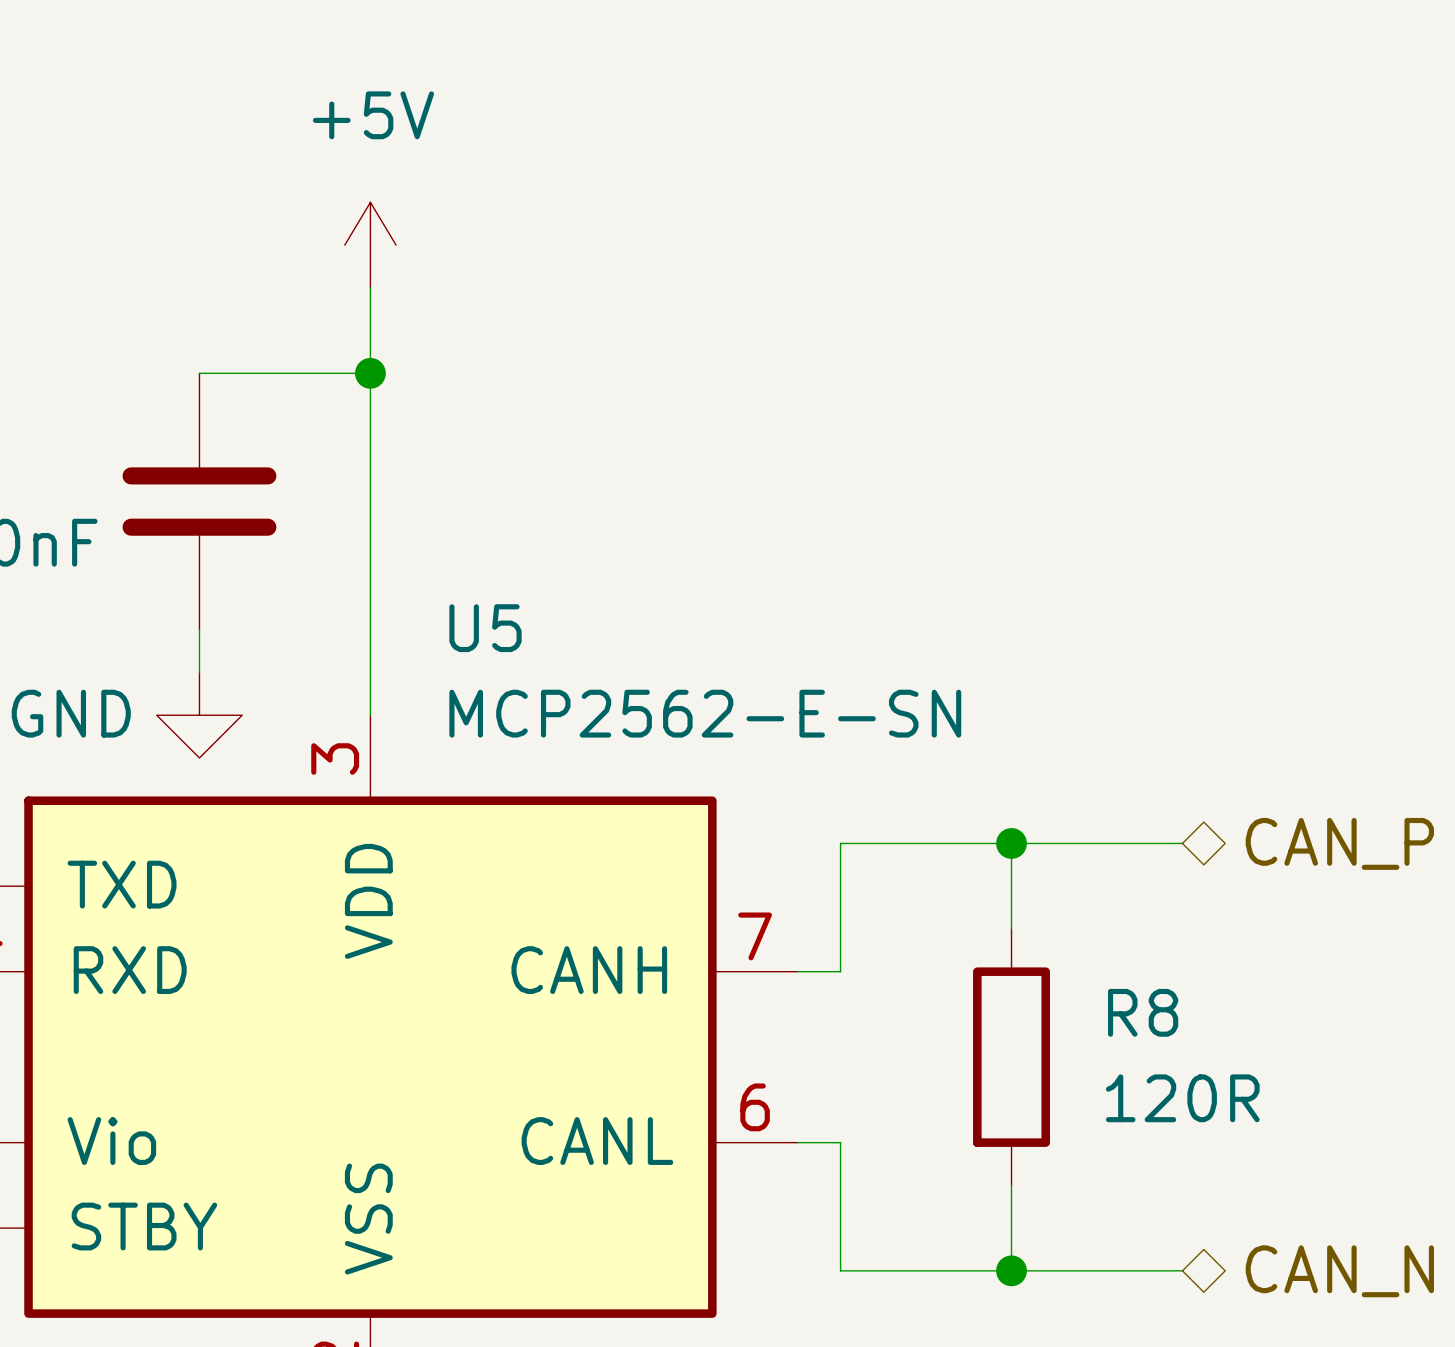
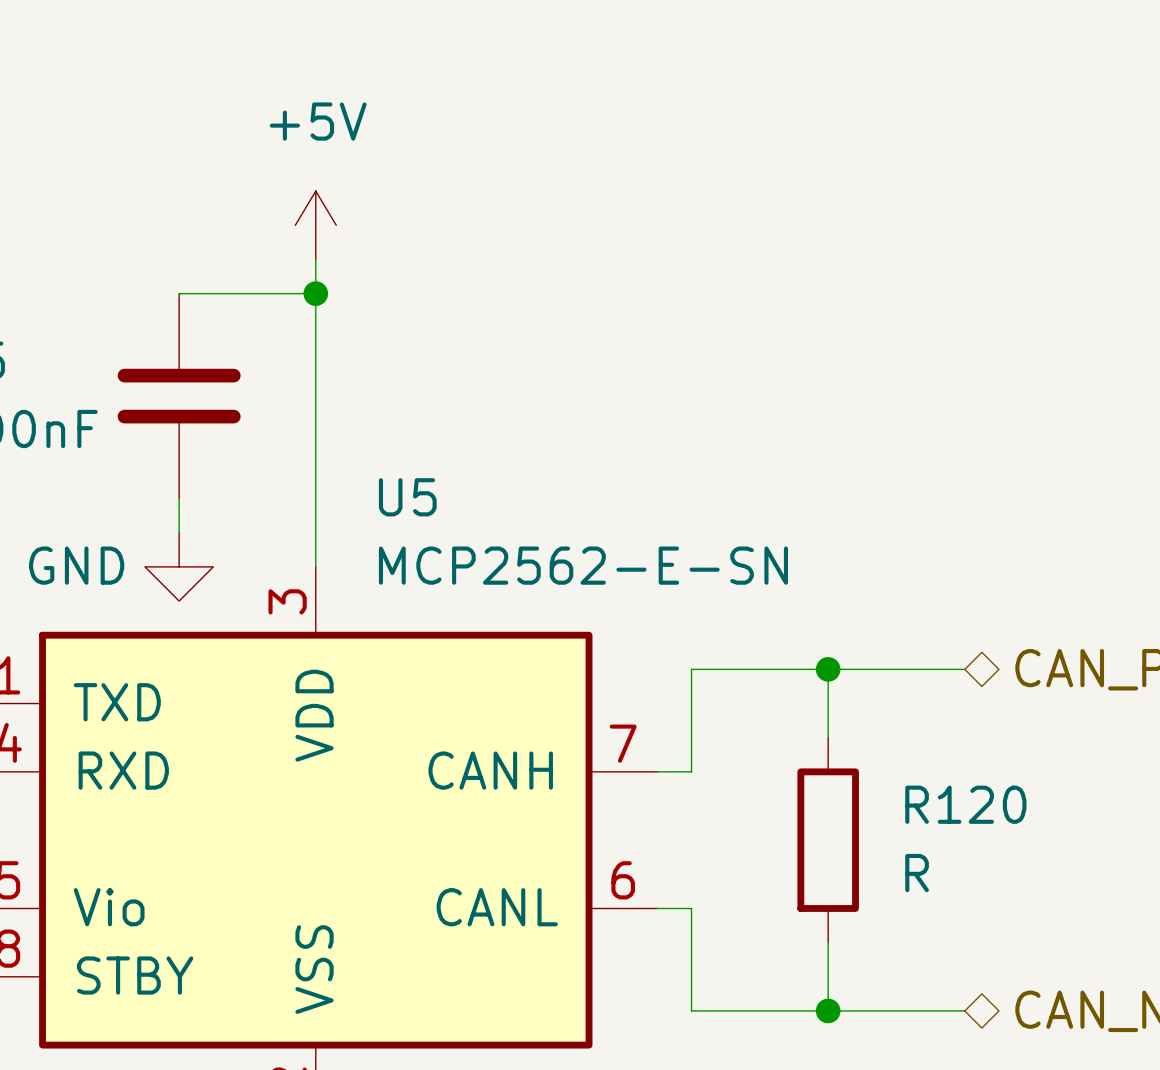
power symbol position: +5V (370, 245) -> +5V (315, 225)
R8 name: R8 (1143, 1012) -> R120 (965, 804)
R8 value: 120R (1182, 1098) -> R (917, 873)

